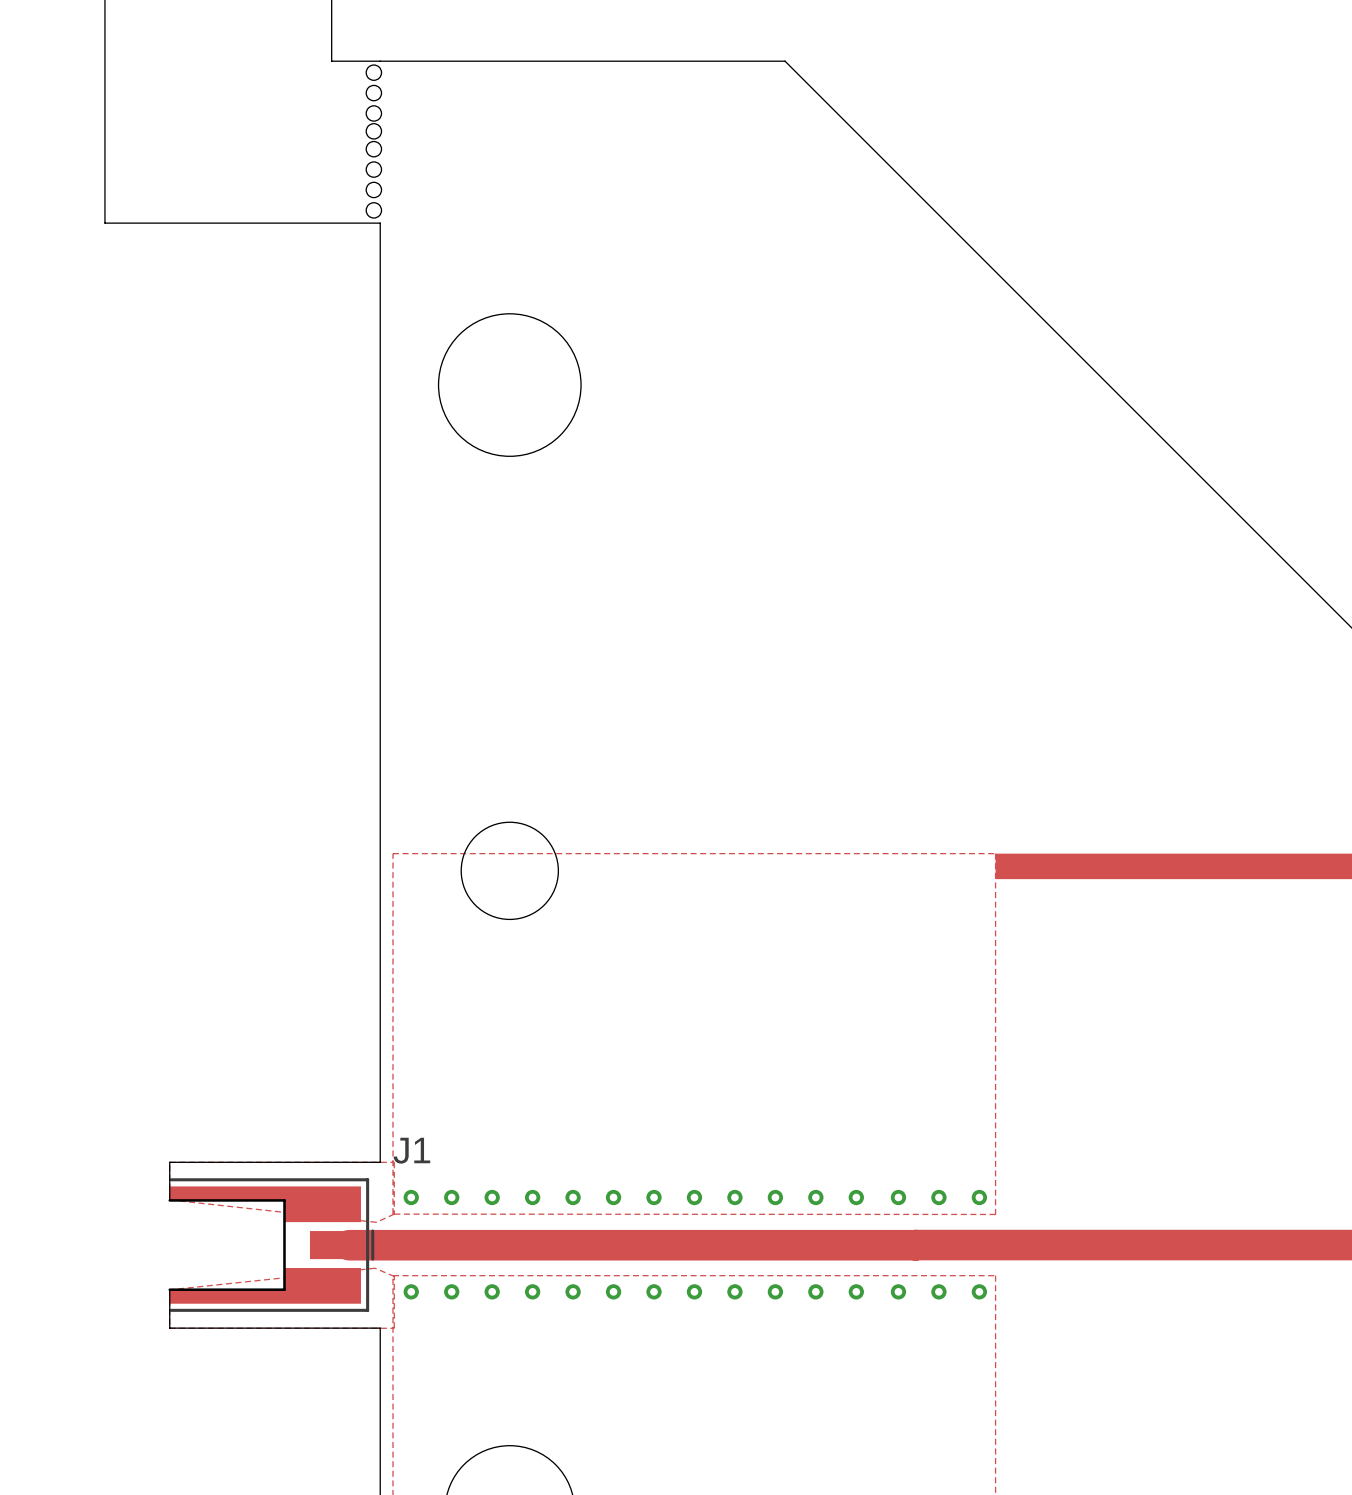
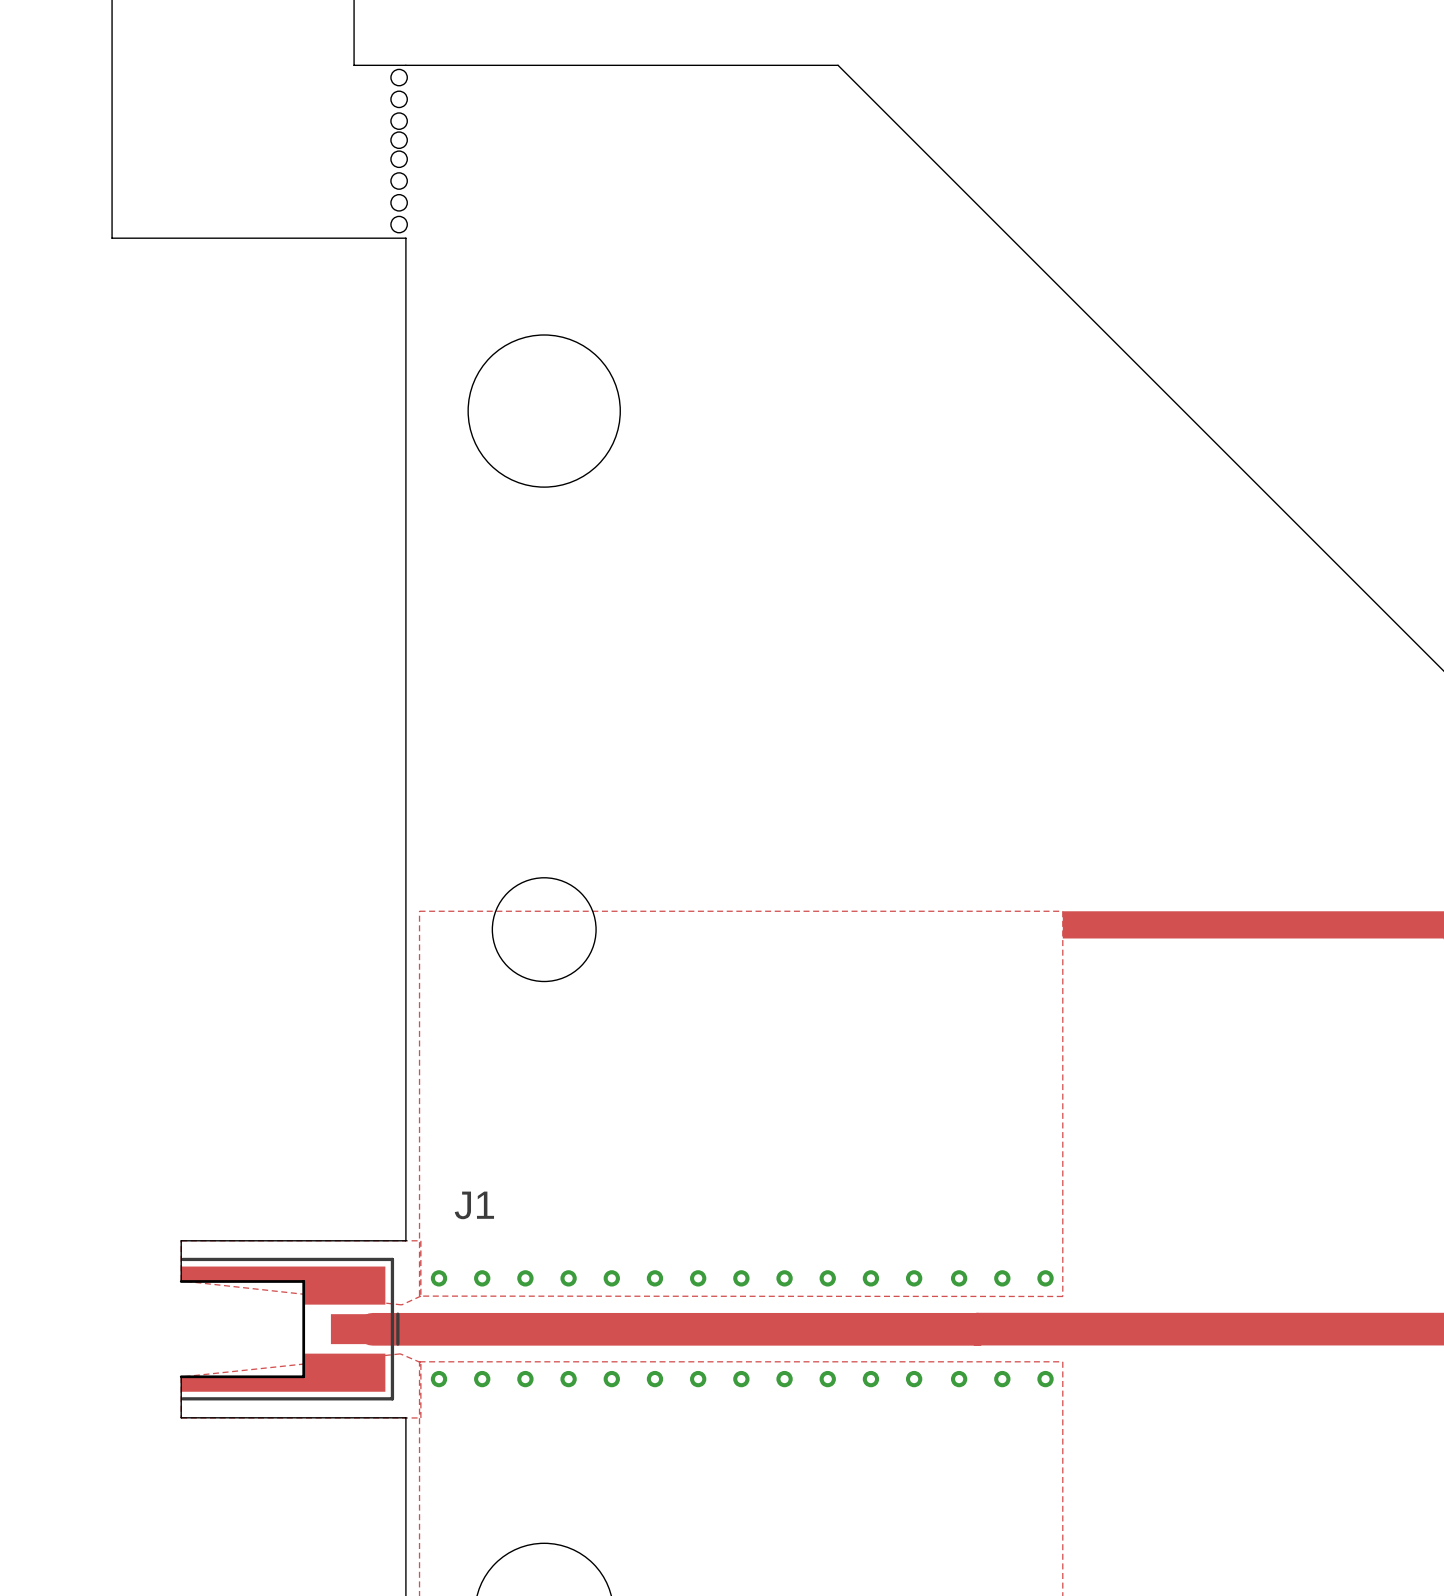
J1 name position: J1 (411, 1150) -> J1 (474, 1205)

